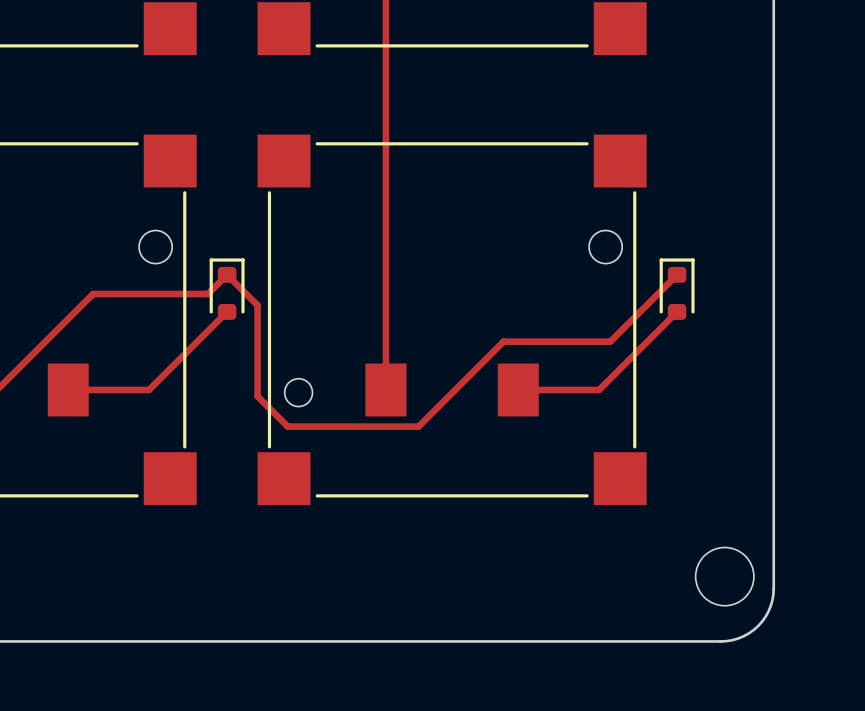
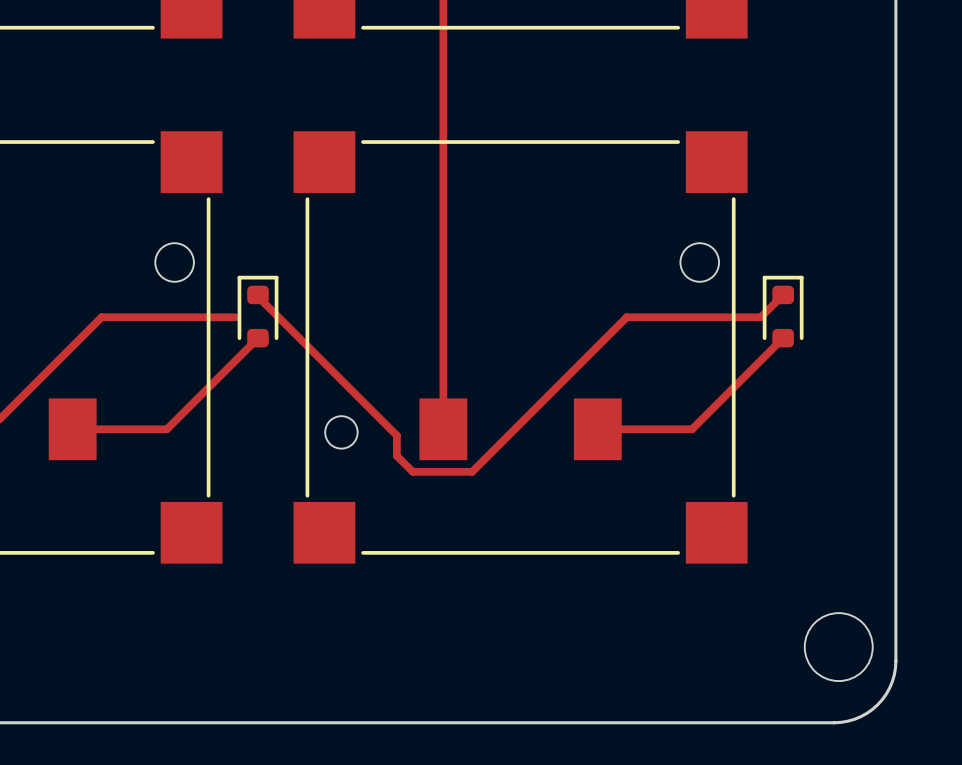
top track: (207, 294) (227, 274) (257, 305) (257, 396) (287, 426) (359, 426) -> (258, 300) (261, 300) (396, 435) (396, 455) (412, 471)
top track: (657, 294) (610, 341) (503, 341) (418, 426) (410, 426) -> (760, 317) (626, 317) (472, 471)

